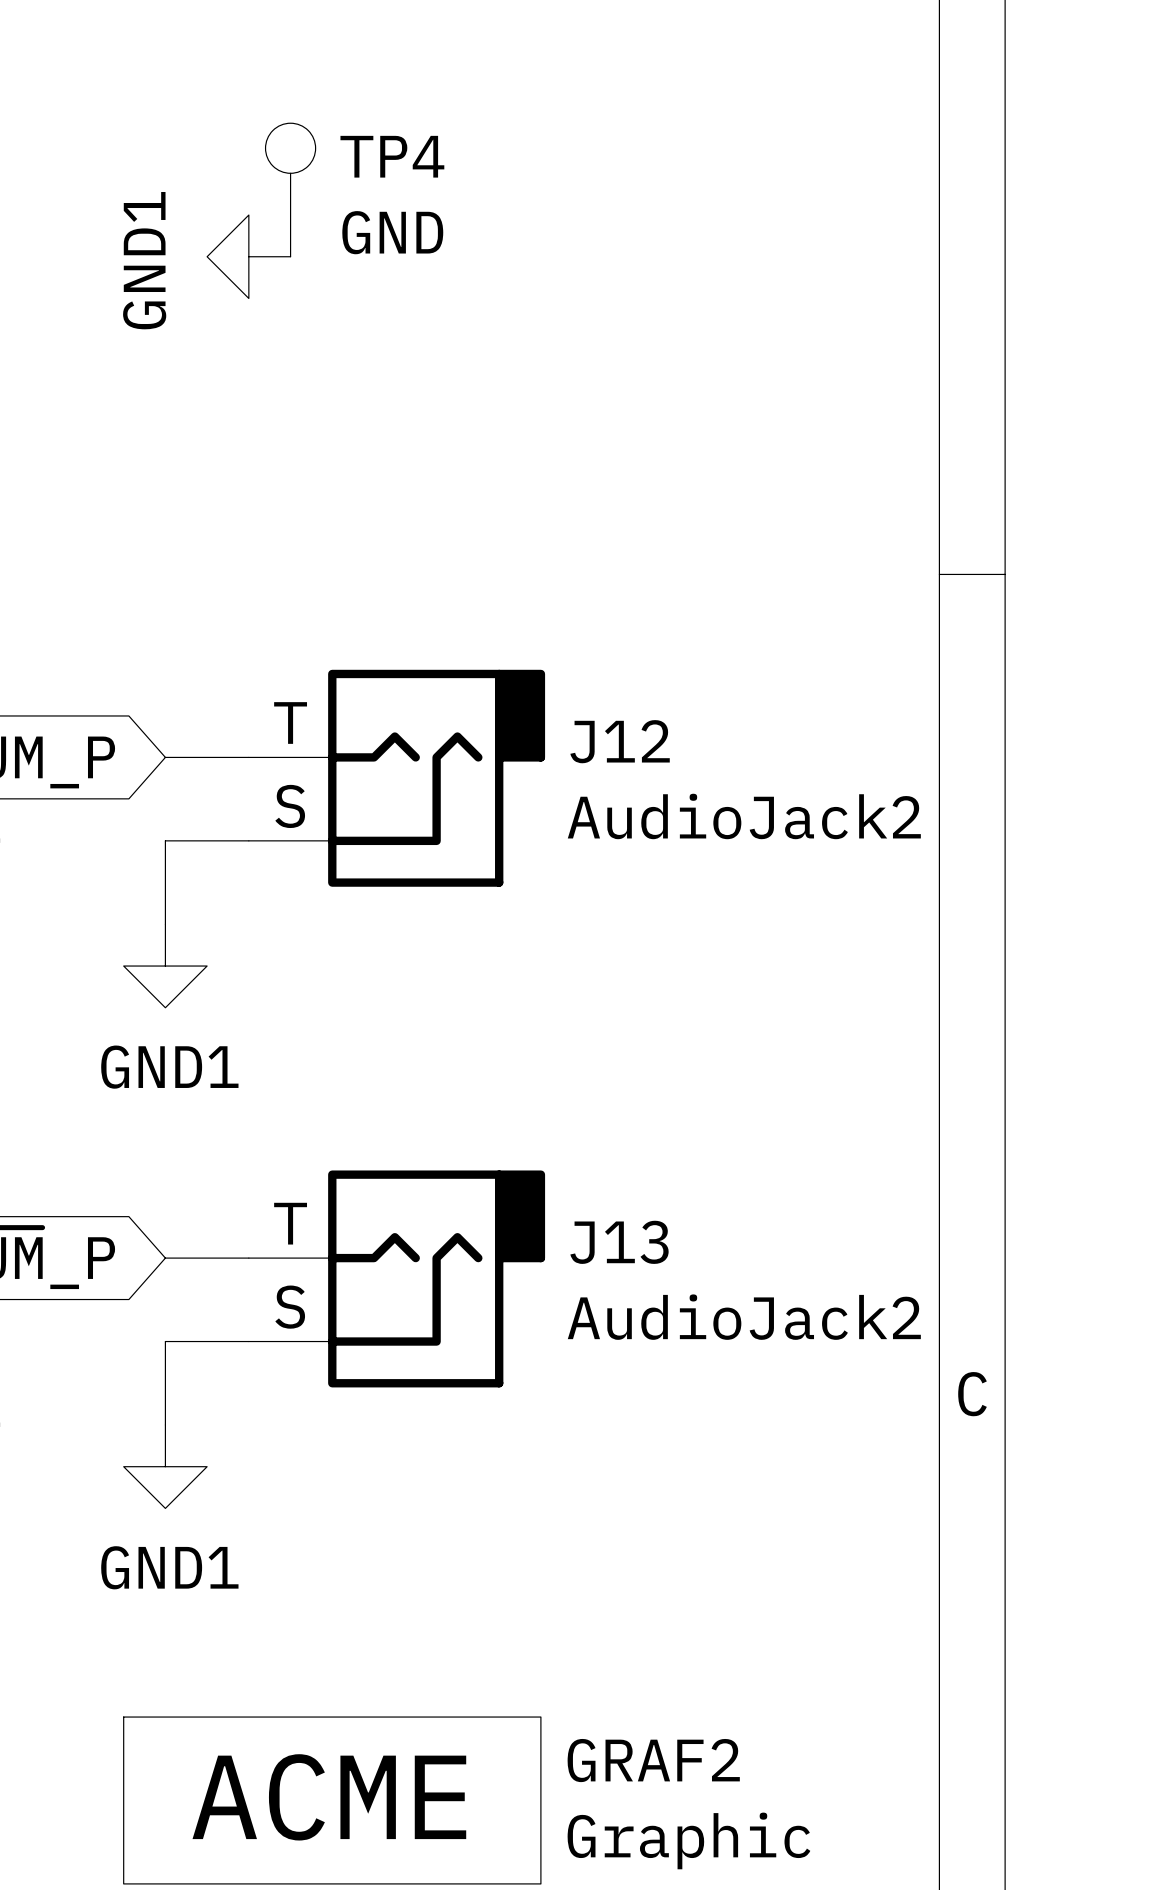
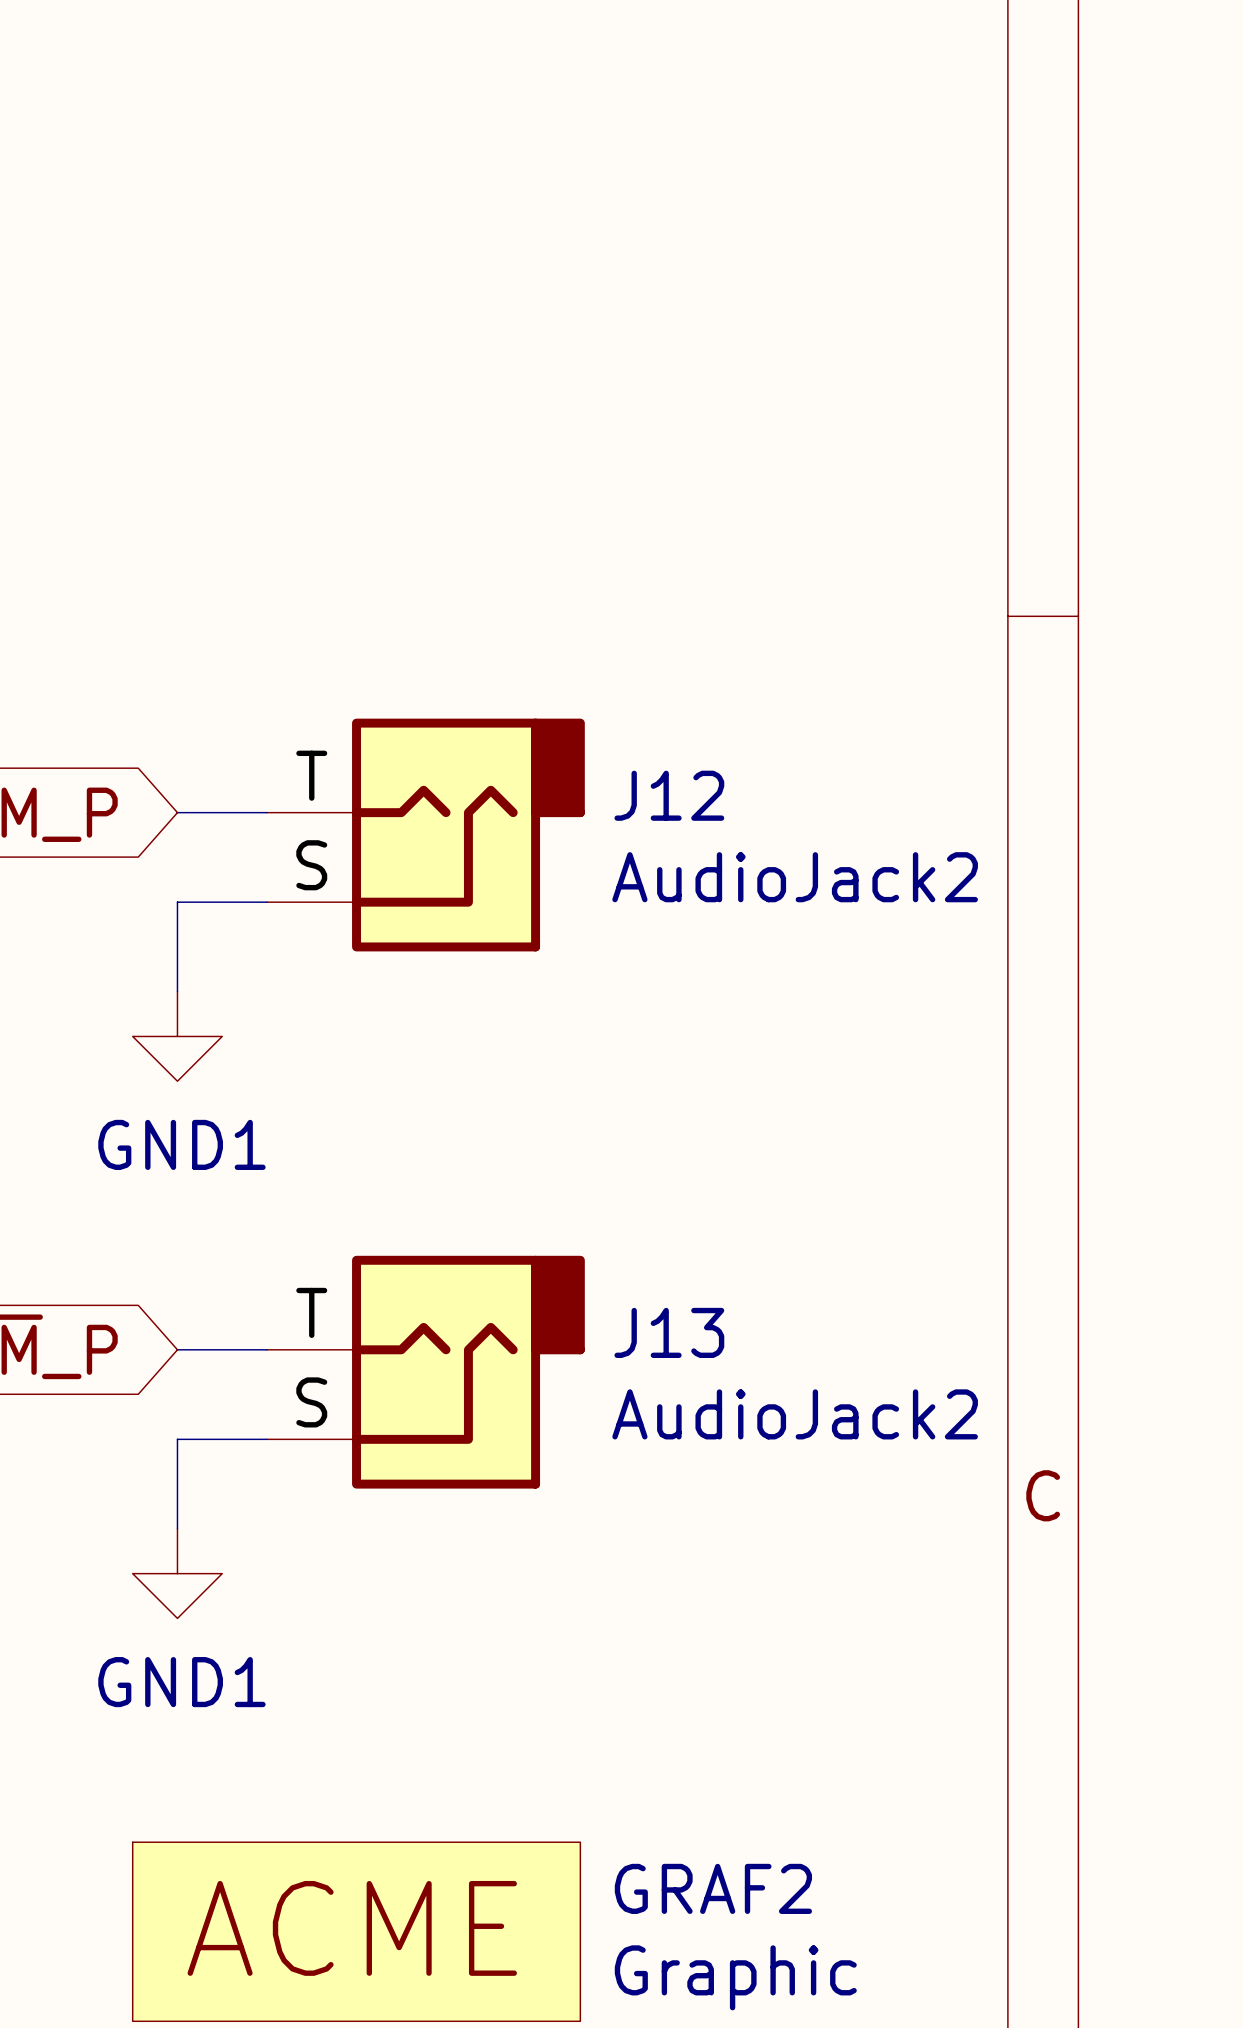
TP4: GND (290, 189) -> none
power symbol: GND1 (248, 256) -> none

